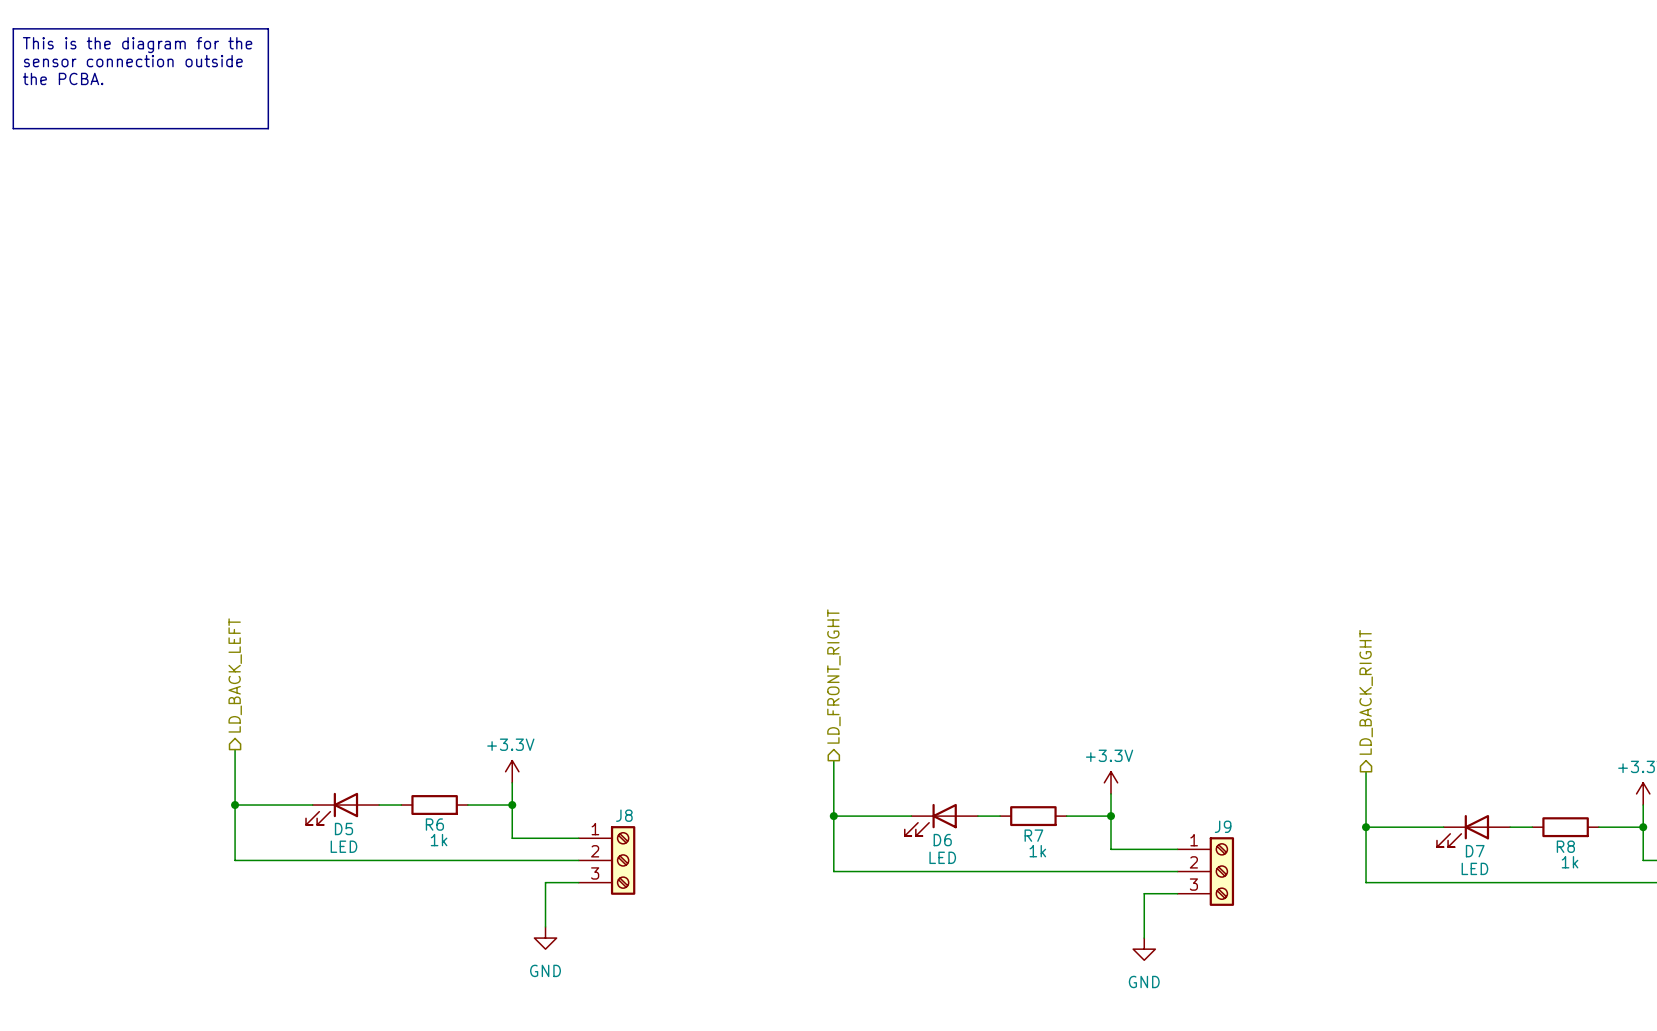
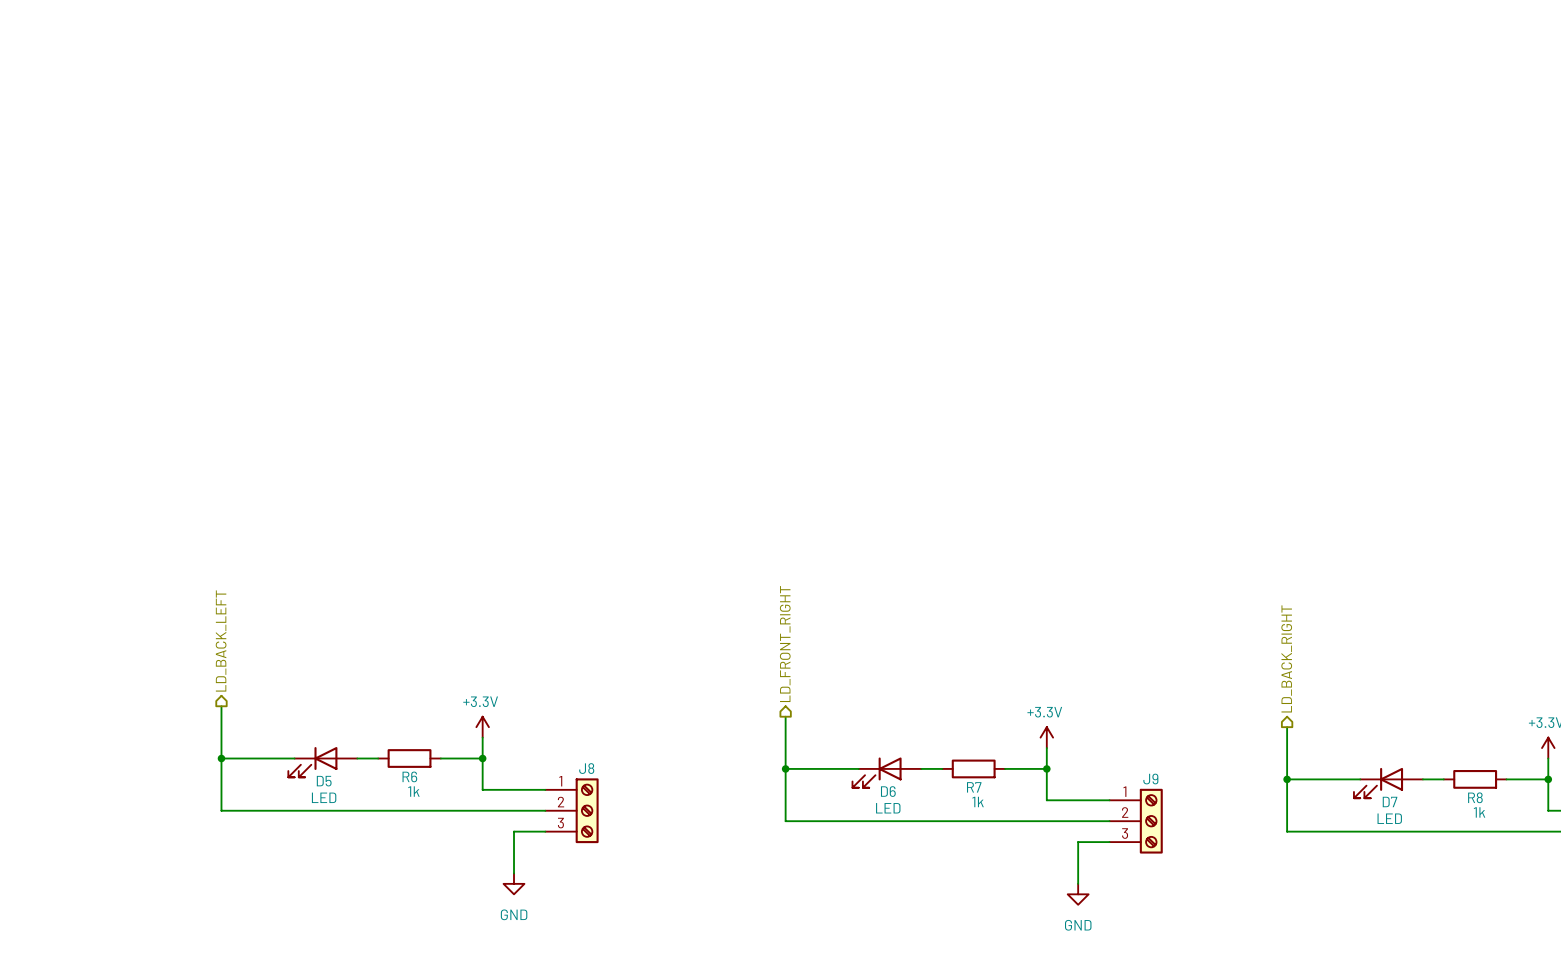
line: (13, 28) (268, 28) (268, 128) (13, 128) (13, 28) -> none
text: This is the diagram for the (137, 45) -> none
text: sensor connection outside (133, 61) -> none
text: the PCBA. (63, 78) -> none

